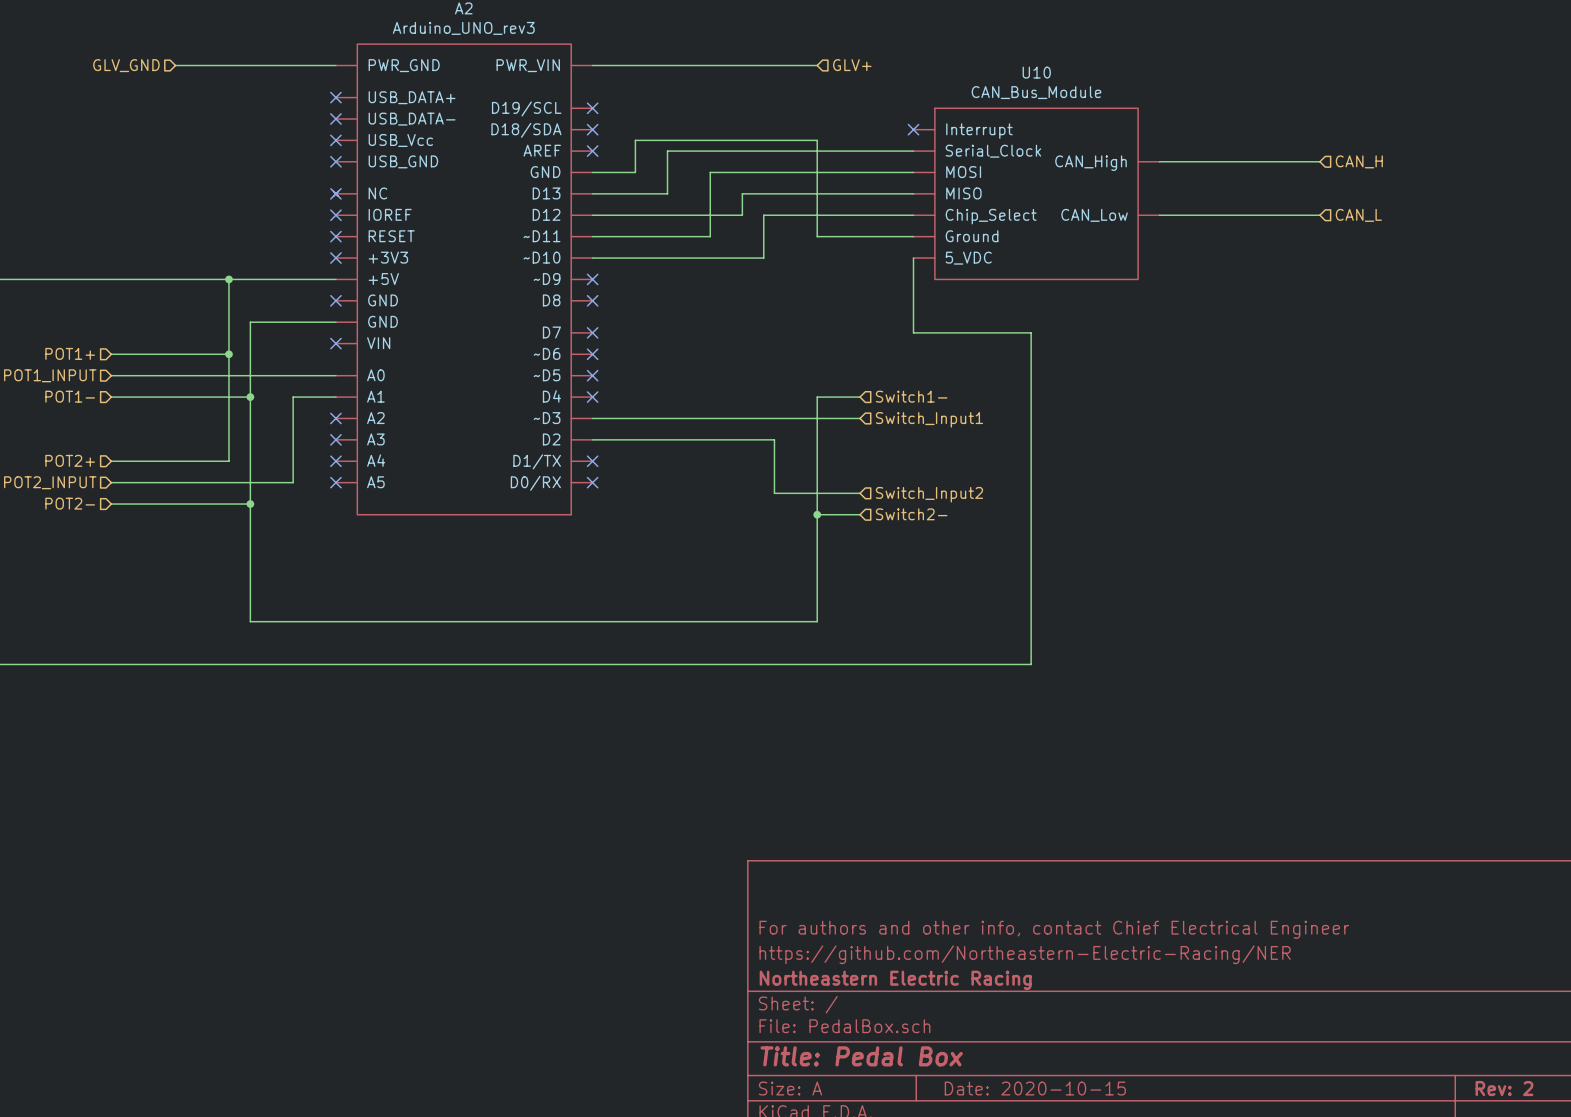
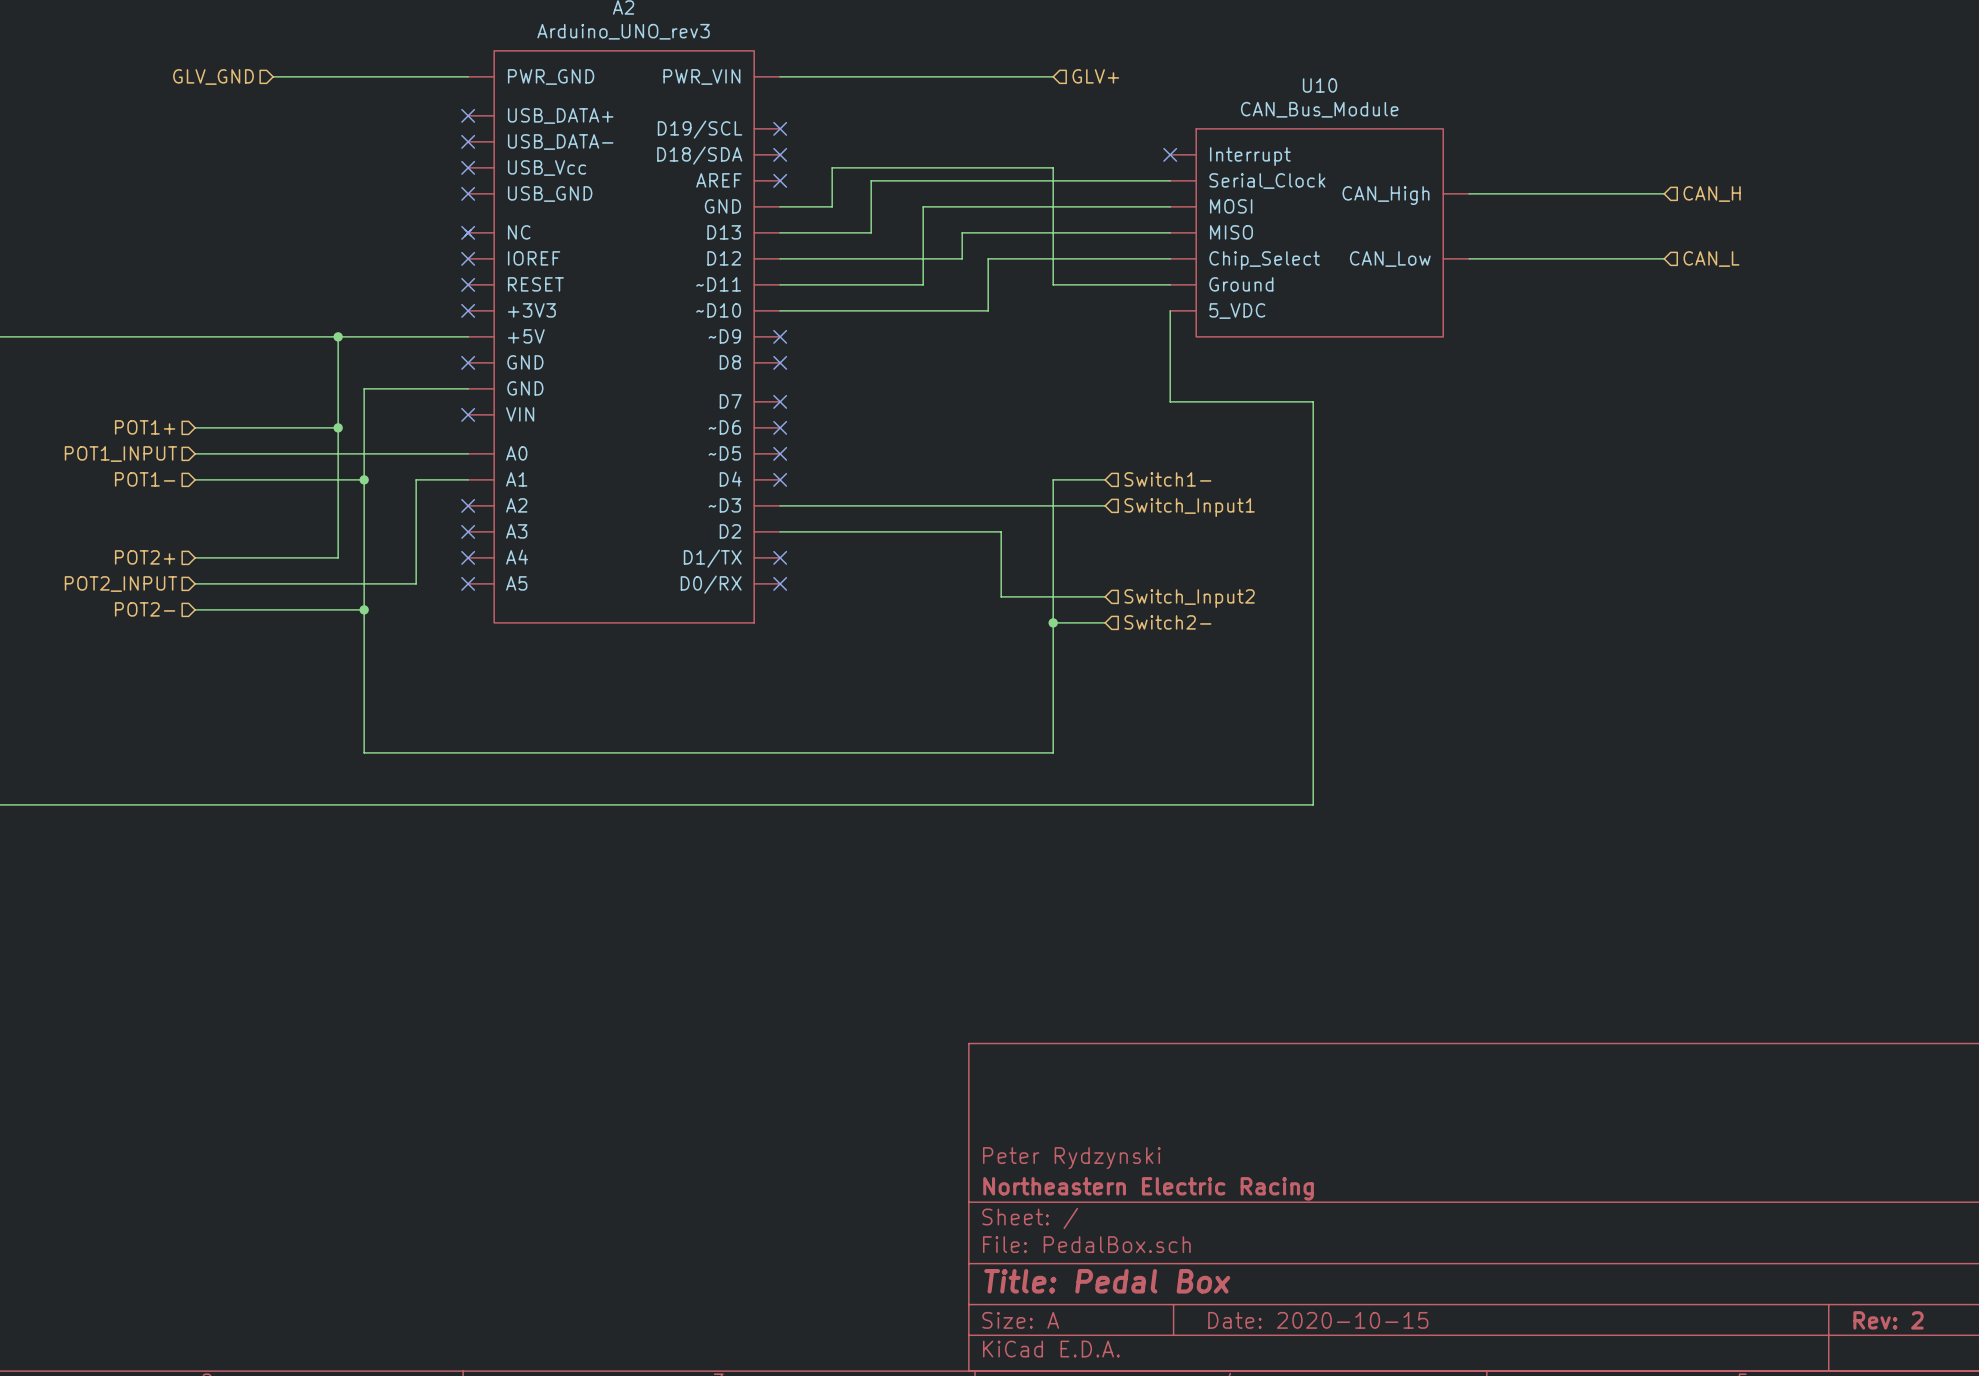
title block: For authors and other info, contact Chief Electrical Engineer (1054, 929) -> none
title block: https://github.com/Northeastern-Electric-Racing/NER (1025, 954) -> Peter Rydzynski (1071, 1158)

